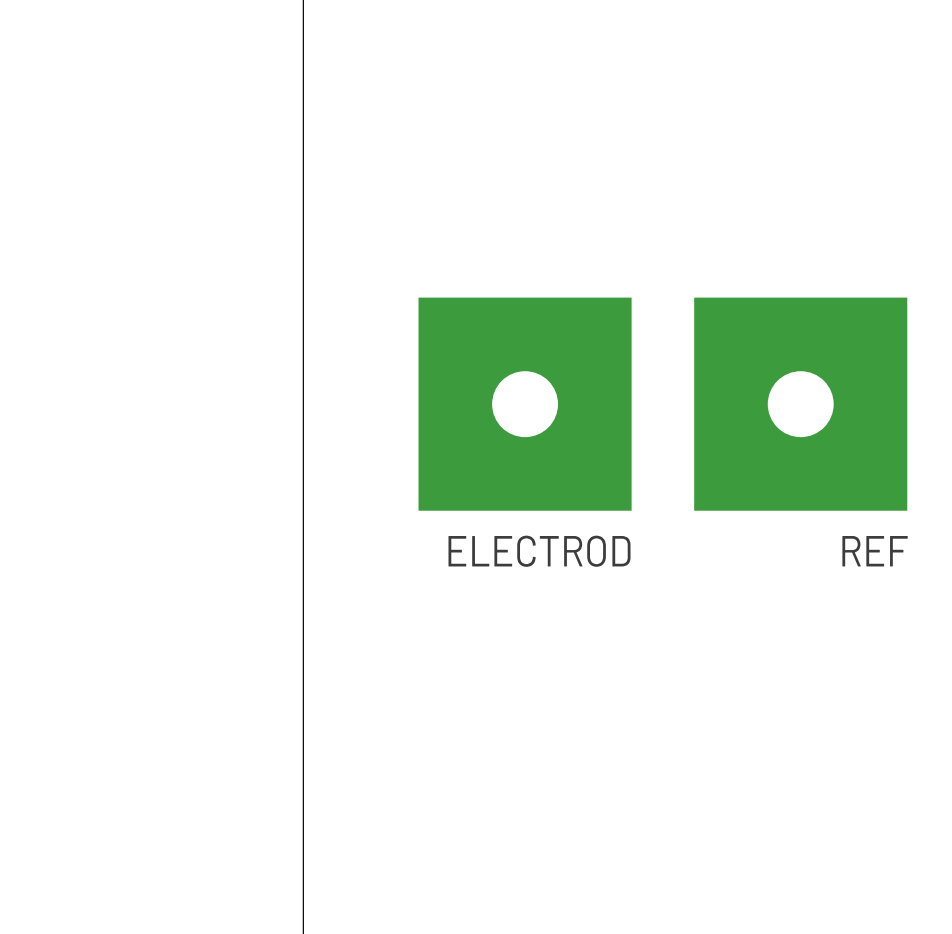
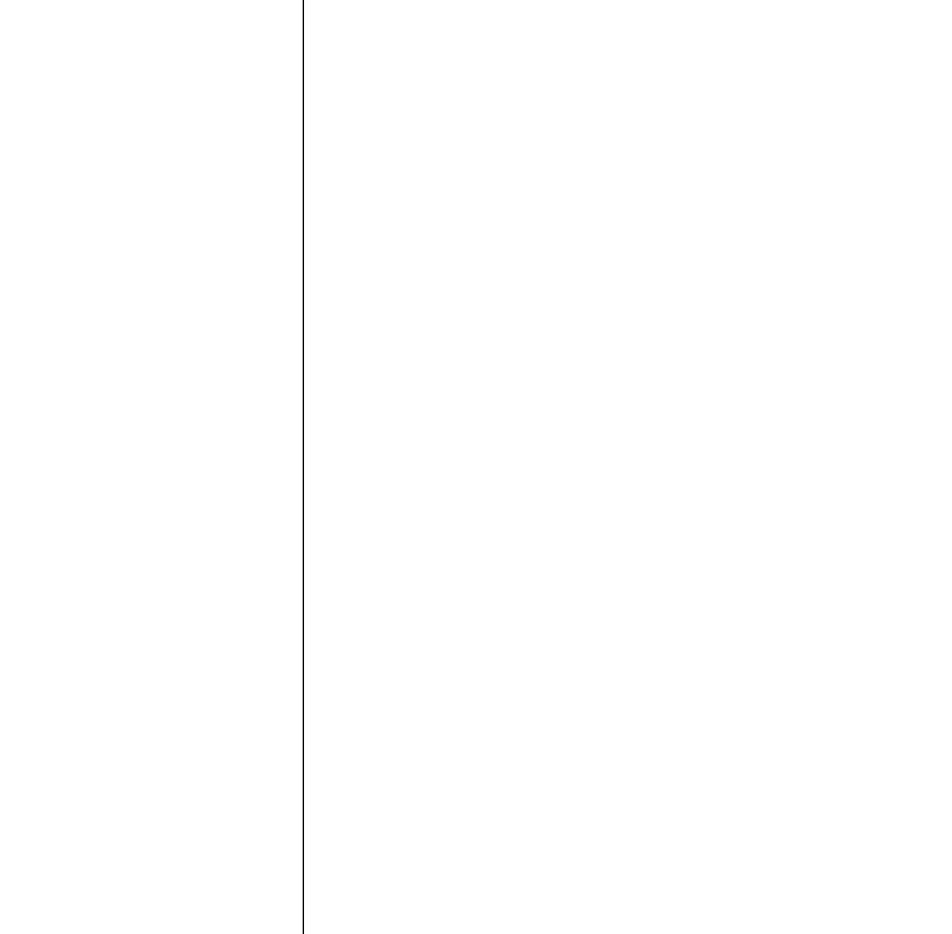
ELECTROD: (525, 404) -> none
REF: (800, 404) -> none

